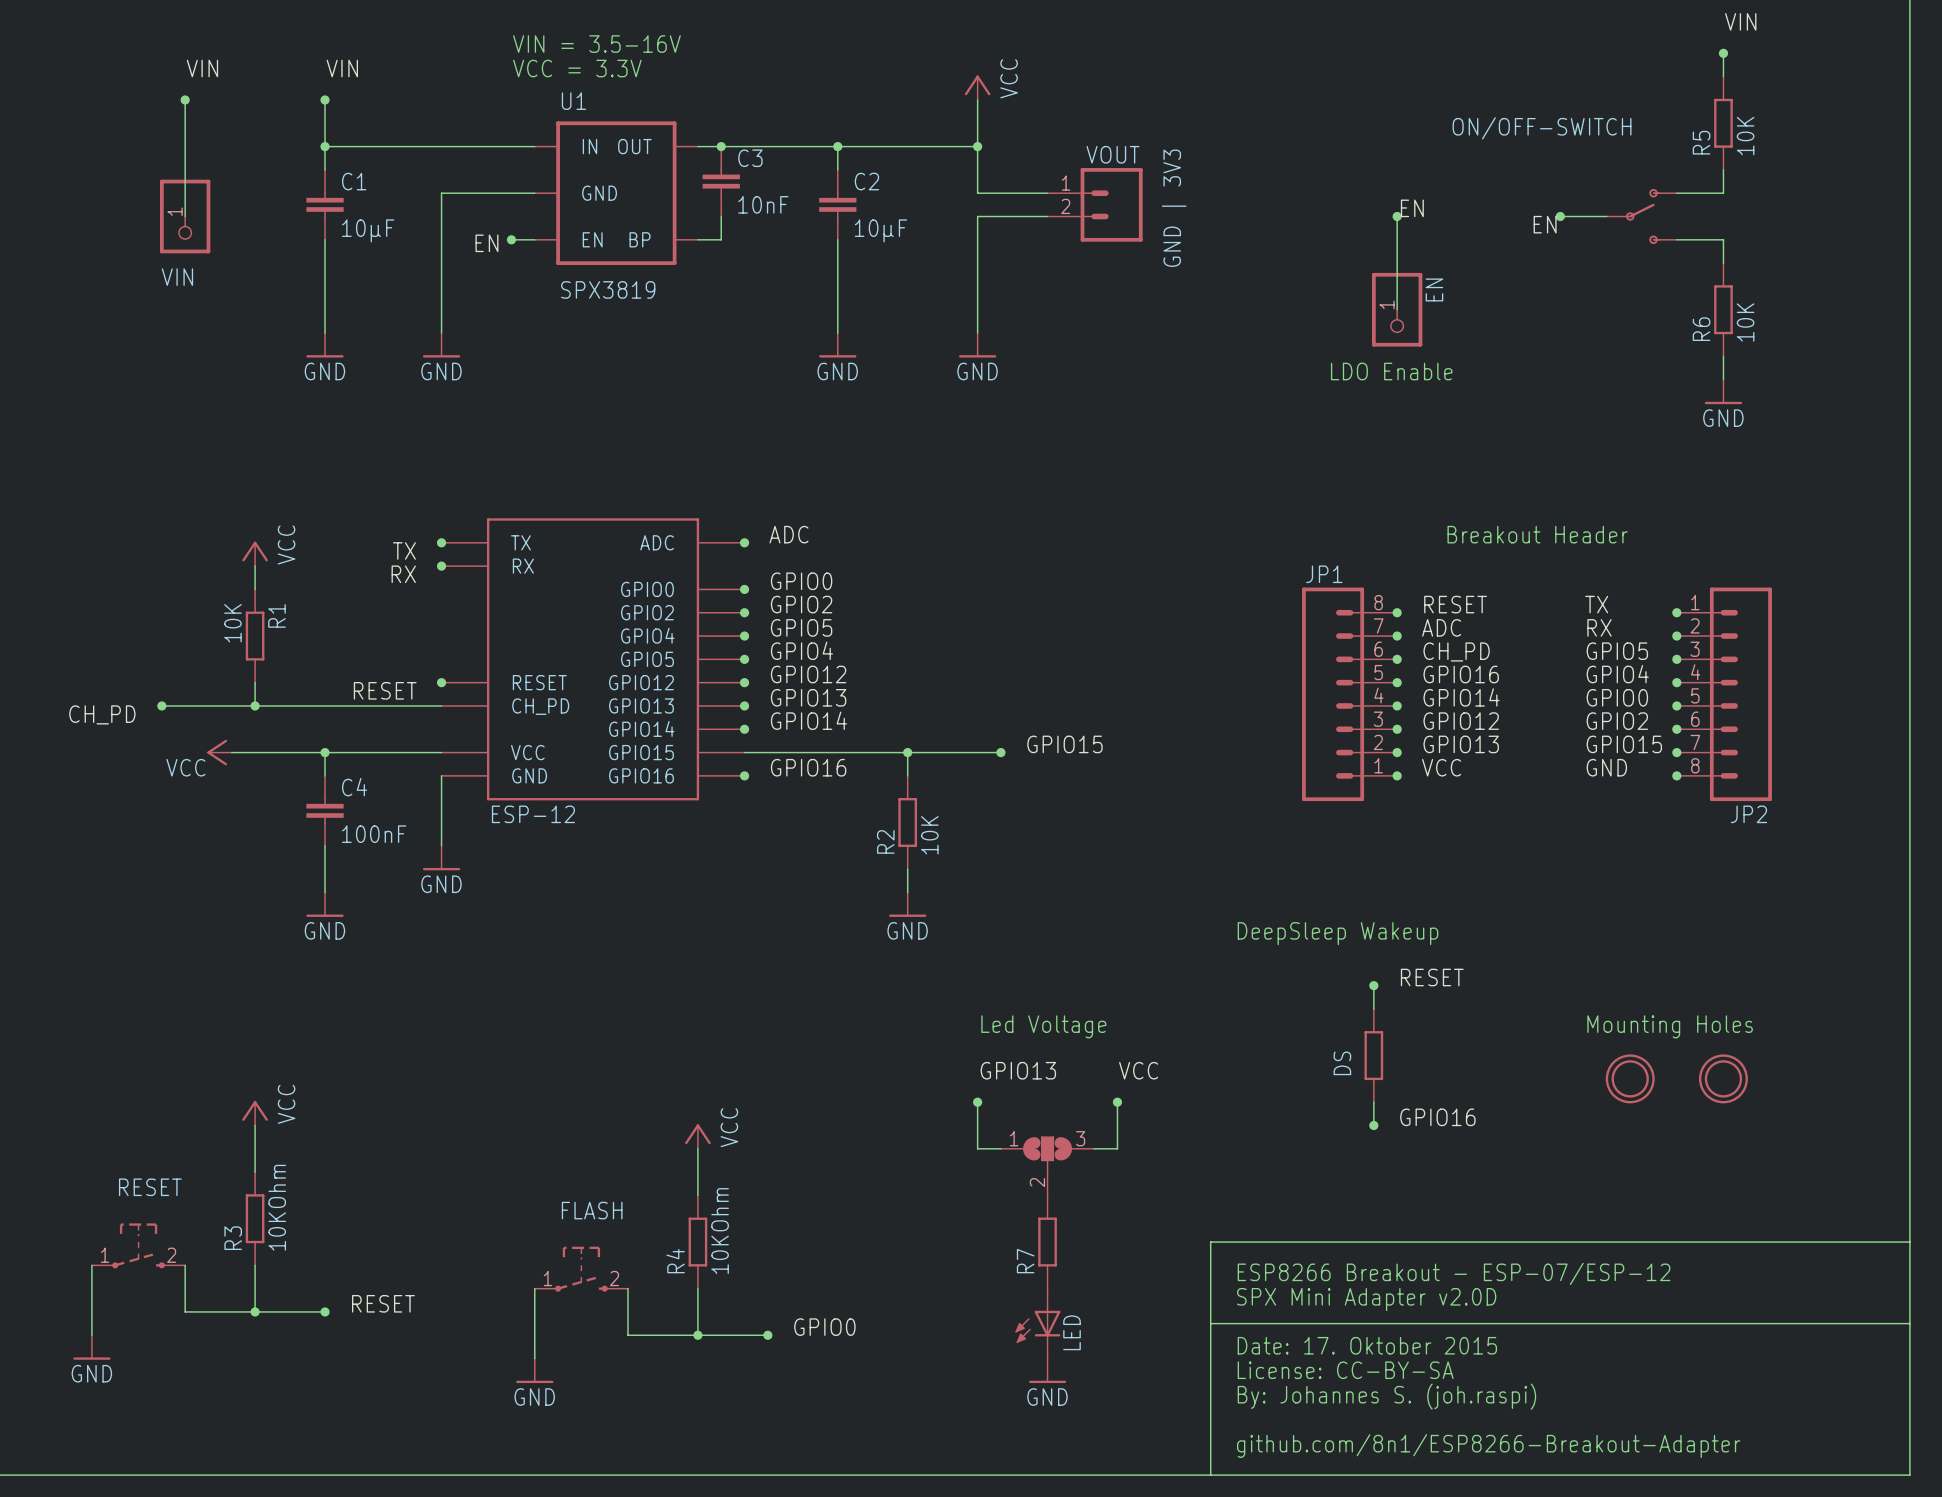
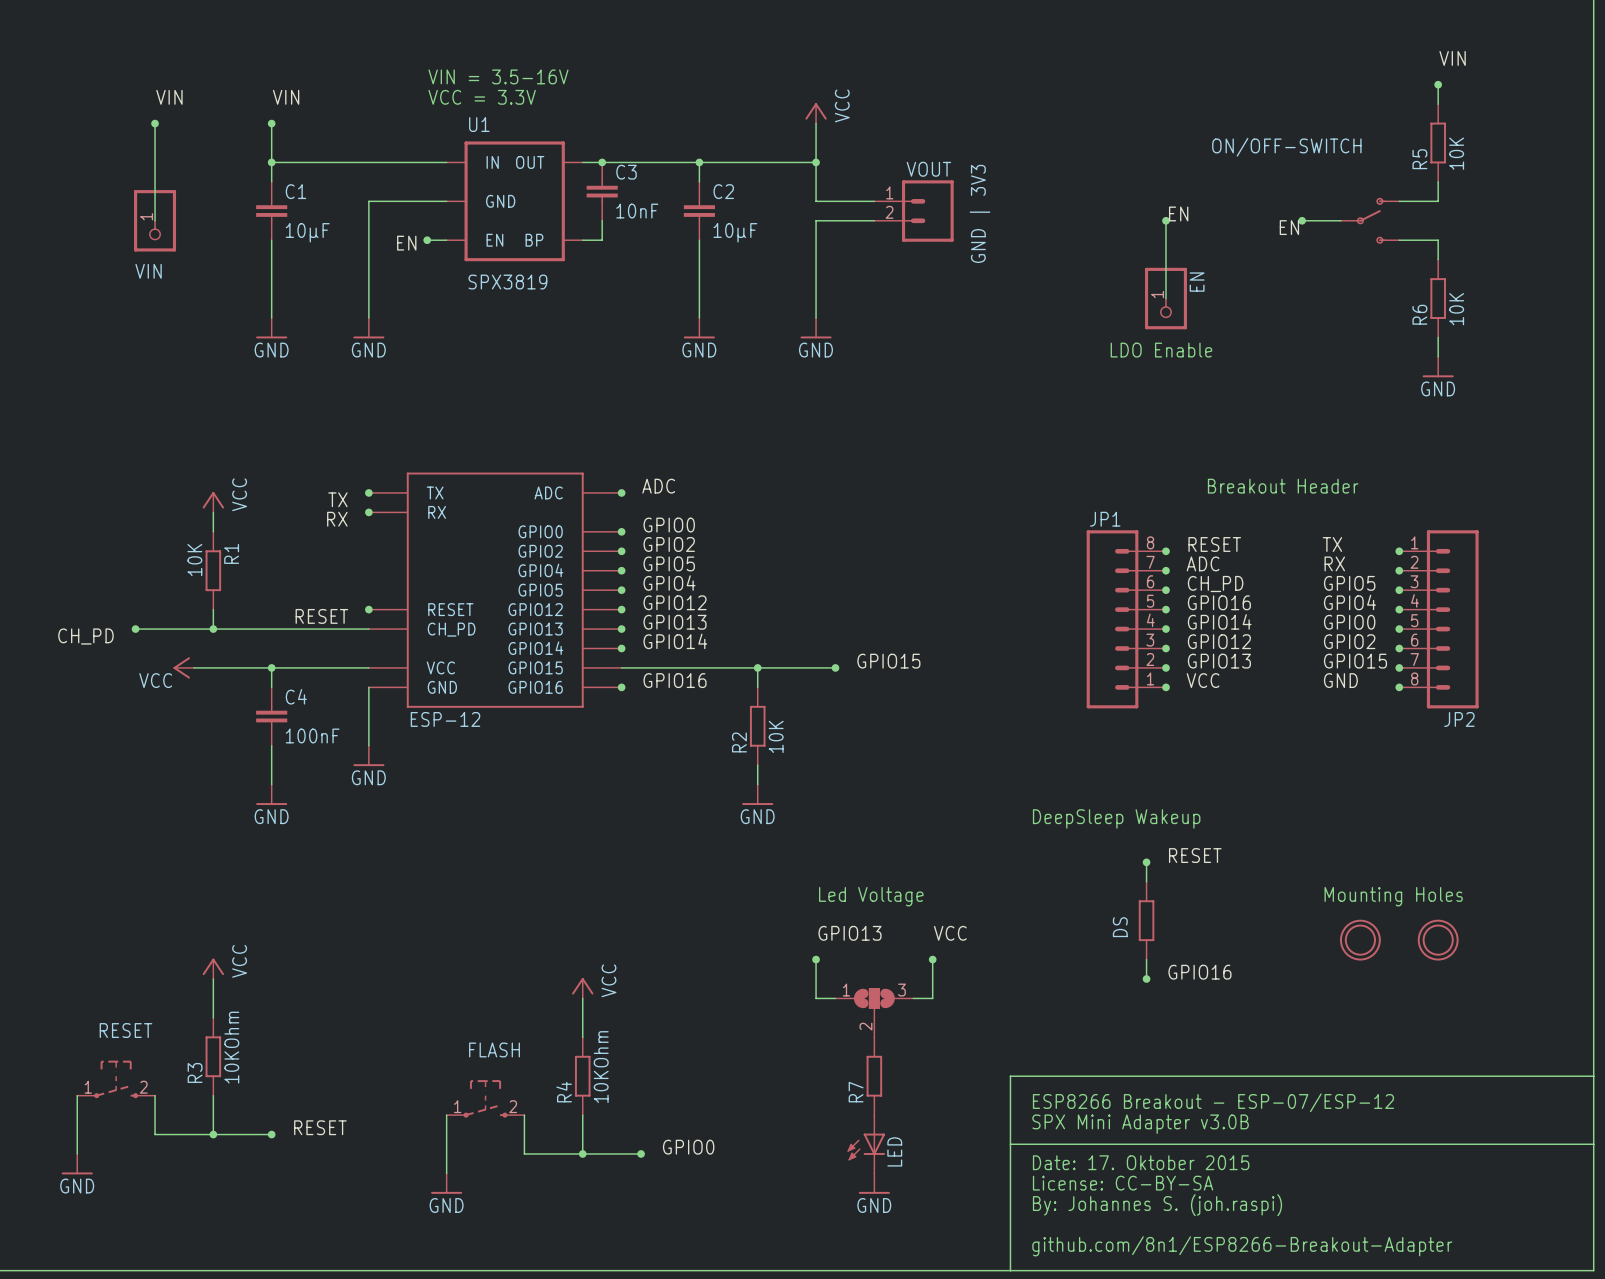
text: SPX Mini Adapter v2.0D (1366, 1299) -> SPX Mini Adapter v3.0B (1140, 1124)

